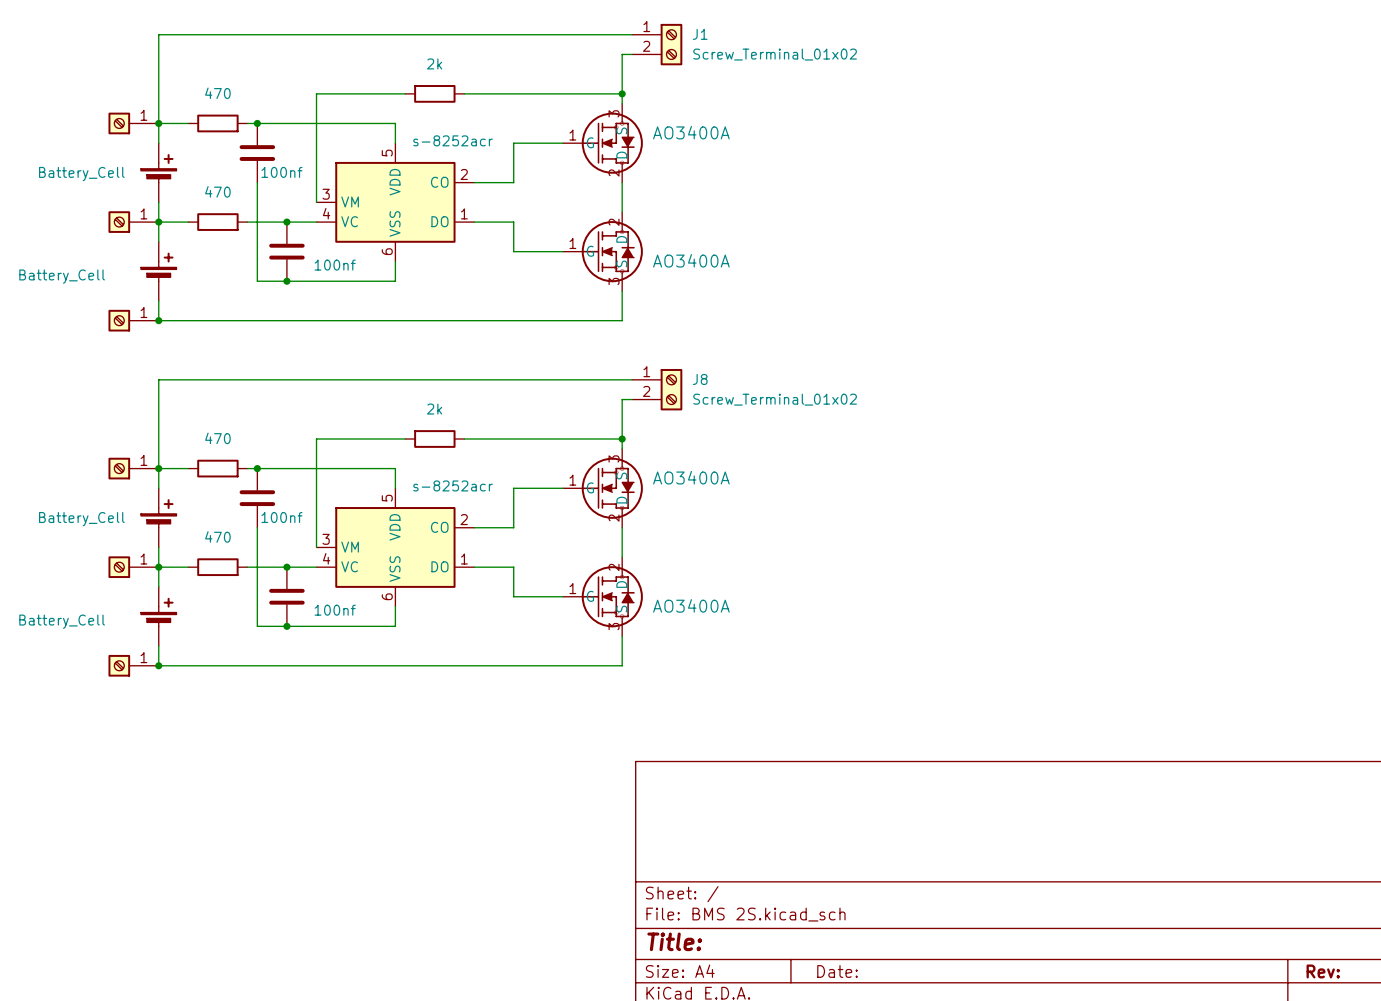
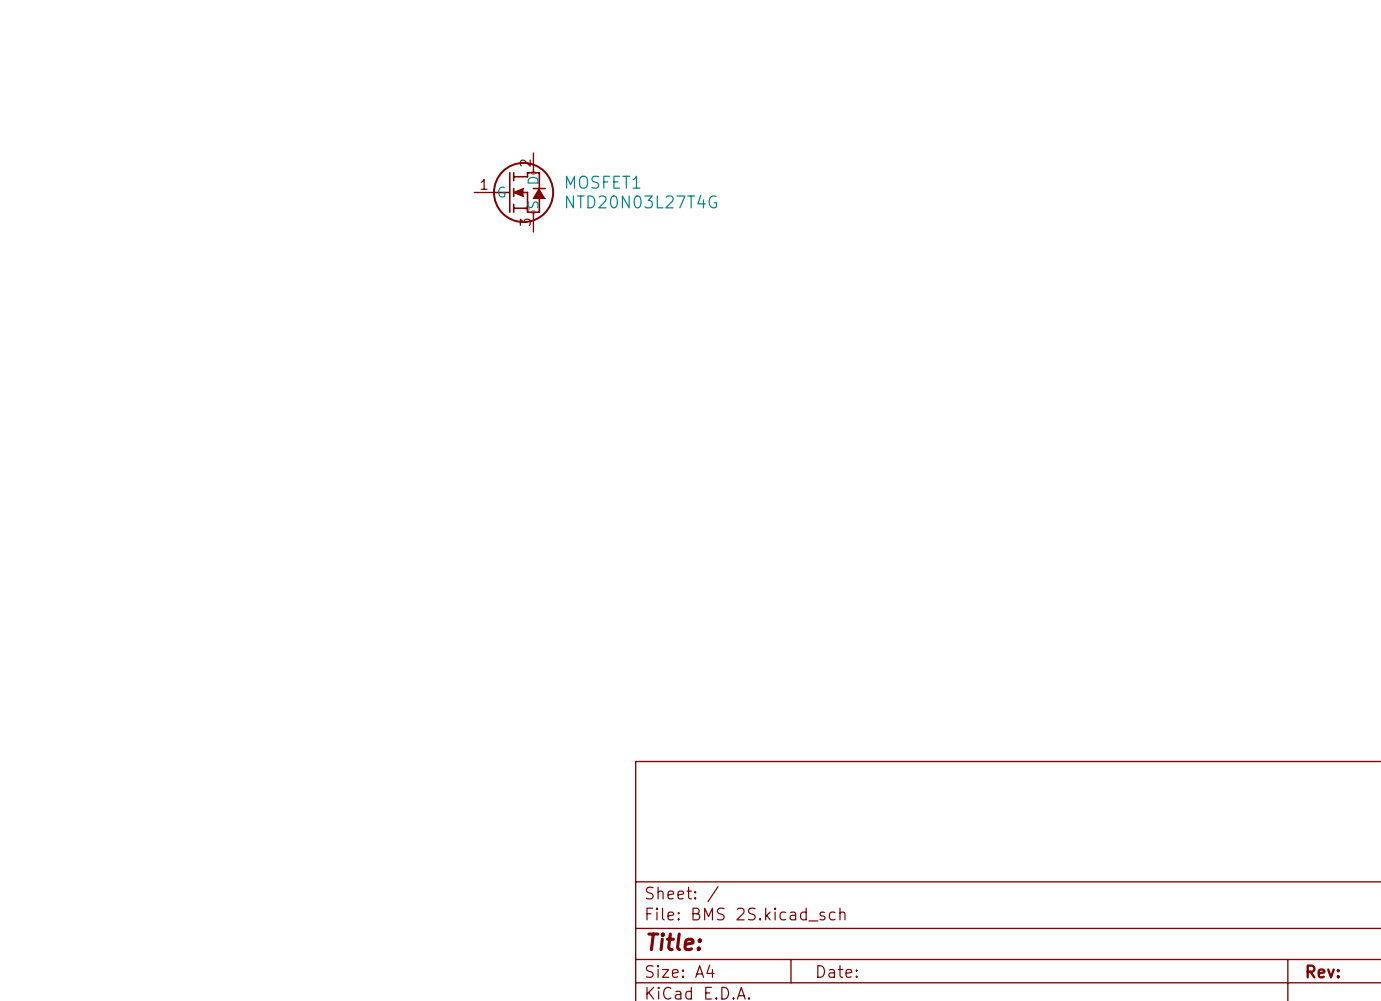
wire: (632, 34) (158, 34) (158, 143) -> none
J1: Screw_Terminal_01x02 (657, 44) -> none
wire: (632, 54) (622, 54) (622, 103) -> none
wire: (405, 93) (316, 93) (316, 202) -> none
part: 2k (434, 93) -> none
wire: (464, 93) (622, 93) -> none
junction: (622, 93) -> none
part: (133, 123) -> none
wire: (158, 123) (188, 123) -> none
junction: (158, 123) -> none
part: 470 (217, 123) -> none
wire: (247, 123) (395, 123) (395, 143) -> none
junction: (257, 123) -> none
wire: (563, 143) (513, 143) (513, 182) (474, 182) -> none
part: AO3400A (602, 143) -> none
part: 100nf (257, 153) -> none
part: Battery_Cell (158, 172) -> none
wire: (257, 182) (257, 281) (395, 281) (395, 261) -> none
wire: (622, 182) (622, 212) -> none
MOSFET1: none -> NTD20N03L27T4G (514, 192)
wire: (158, 202) (158, 241) -> none
part: s-8252acr (395, 202) -> none
part: (133, 222) -> none
wire: (158, 222) (188, 222) -> none
junction: (158, 222) -> none
part: 470 (217, 222) -> none
wire: (247, 222) (316, 222) -> none
junction: (286, 222) -> none
wire: (474, 222) (513, 222) (513, 251) (563, 251) -> none
part: 100nf (286, 251) -> none
part: AO3400A (602, 251) -> none
part: Battery_Cell (158, 271) -> none
junction: (286, 281) -> none
wire: (622, 291) (622, 320) (158, 320) (158, 300) -> none
part: (133, 320) -> none
junction: (158, 320) -> none
wire: (632, 379) (158, 379) (158, 488) -> none
J8: Screw_Terminal_01x02 (657, 389) -> none
wire: (632, 399) (622, 399) (622, 448) -> none
wire: (405, 438) (316, 438) (316, 547) -> none
part: 2k (434, 438) -> none
wire: (464, 438) (622, 438) -> none
junction: (622, 438) -> none
part: (133, 468) -> none
wire: (158, 468) (188, 468) -> none
junction: (158, 468) -> none
part: 470 (217, 468) -> none
wire: (247, 468) (395, 468) (395, 488) -> none
junction: (257, 468) -> none
wire: (563, 488) (513, 488) (513, 527) (474, 527) -> none
part: AO3400A (602, 488) -> none
part: 100nf (257, 498) -> none
part: Battery_Cell (158, 517) -> none
wire: (257, 527) (257, 626) (395, 626) (395, 606) -> none
wire: (622, 527) (622, 557) -> none
wire: (158, 547) (158, 586) -> none
part: s-8252acr (395, 547) -> none
part: (133, 567) -> none
wire: (158, 567) (188, 567) -> none
junction: (158, 567) -> none
part: 470 (217, 567) -> none
wire: (247, 567) (316, 567) -> none
junction: (286, 567) -> none
wire: (474, 567) (513, 567) (513, 596) (563, 596) -> none
part: 100nf (286, 596) -> none
part: AO3400A (602, 596) -> none
part: Battery_Cell (158, 616) -> none
junction: (286, 626) -> none
wire: (622, 636) (622, 665) (158, 665) (158, 646) -> none
part: (133, 665) -> none
junction: (158, 665) -> none

